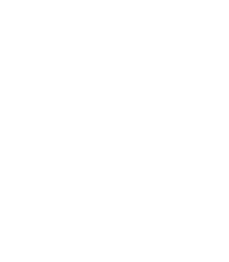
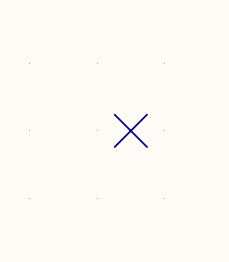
no-connect mark: none -> (130, 130)

